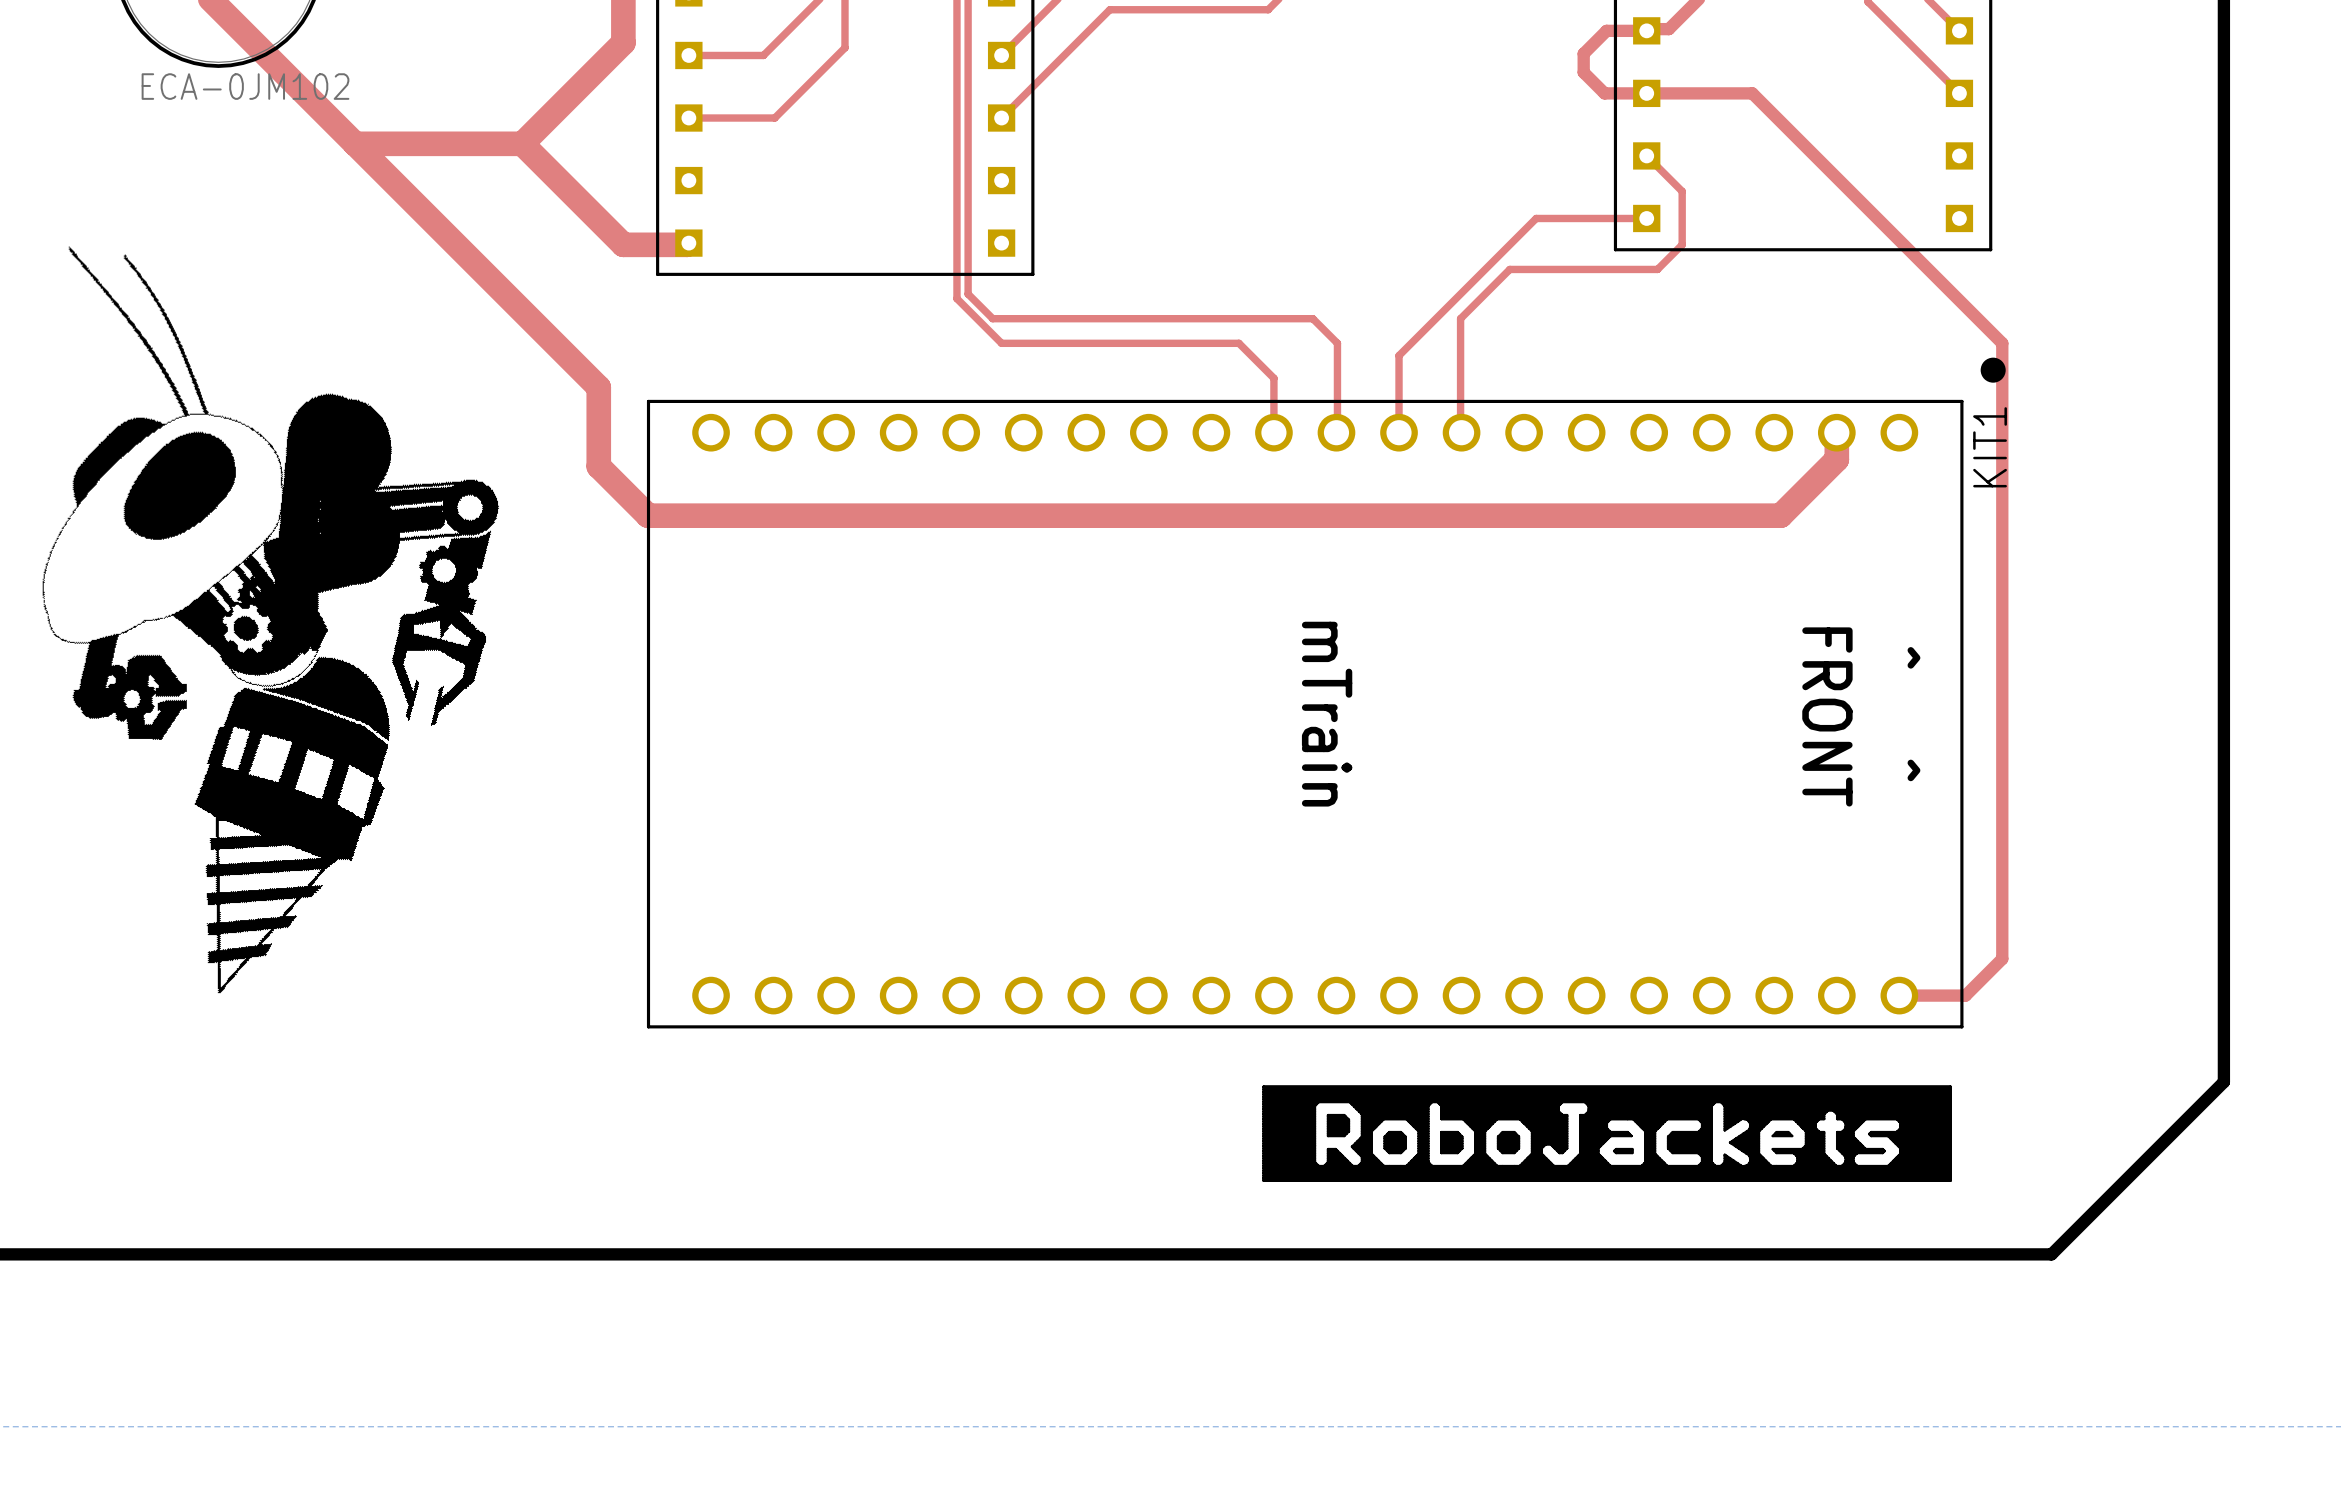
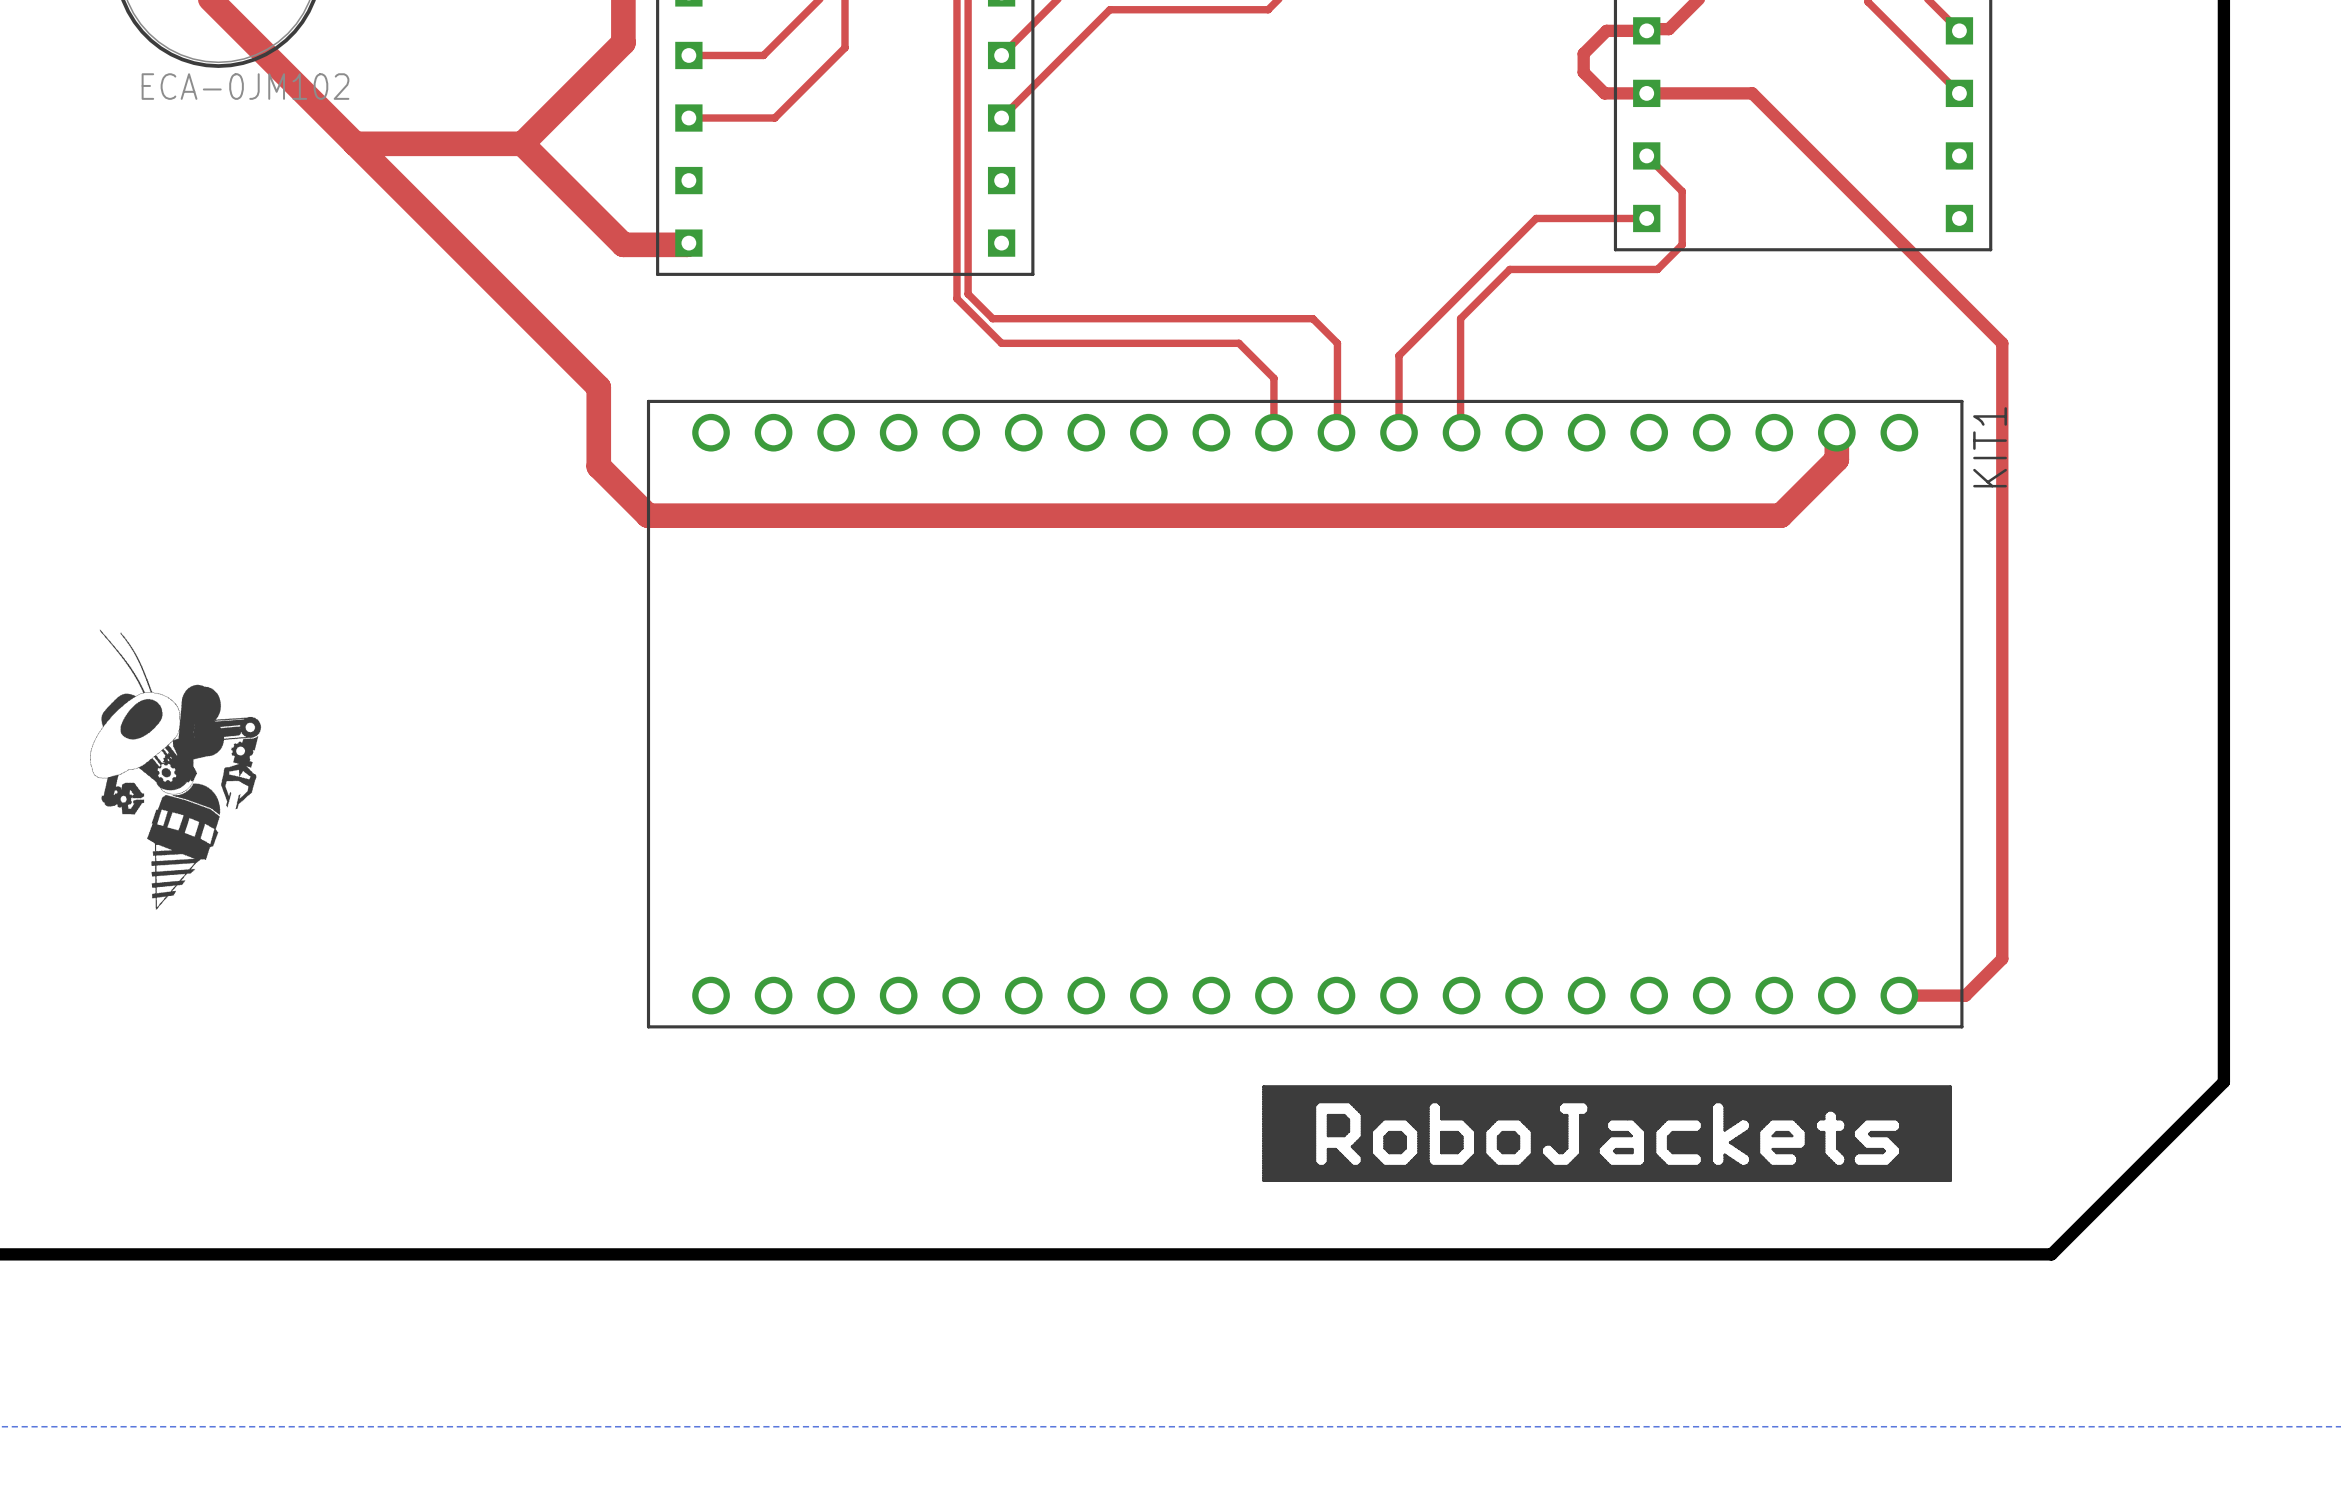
drawing: [42, 246, 500, 994] -> none
KIT1 footprint: [646, 357, 2006, 1029] -> [646, 399, 1964, 1029]
drawing: none -> [90, 629, 262, 910]

